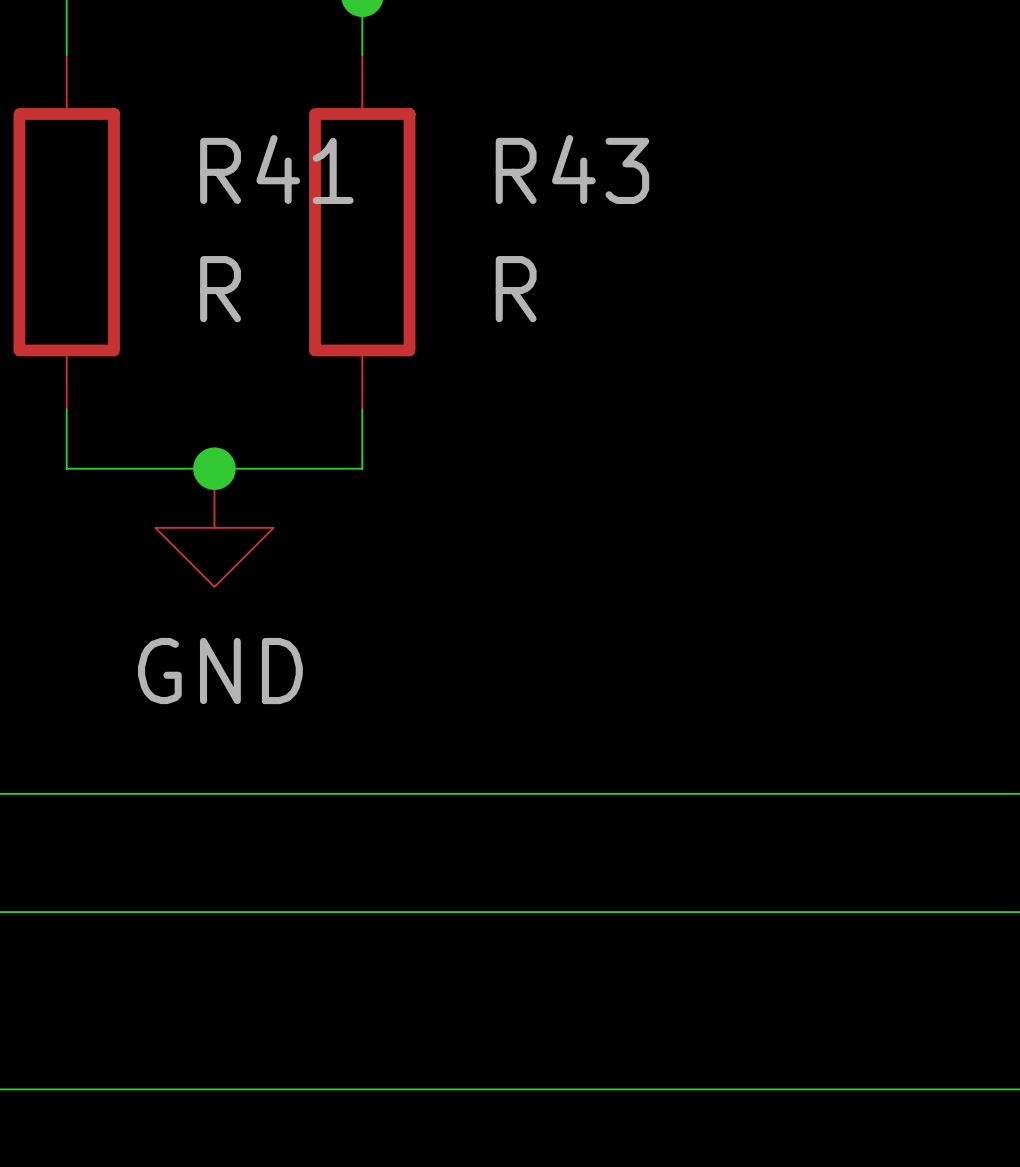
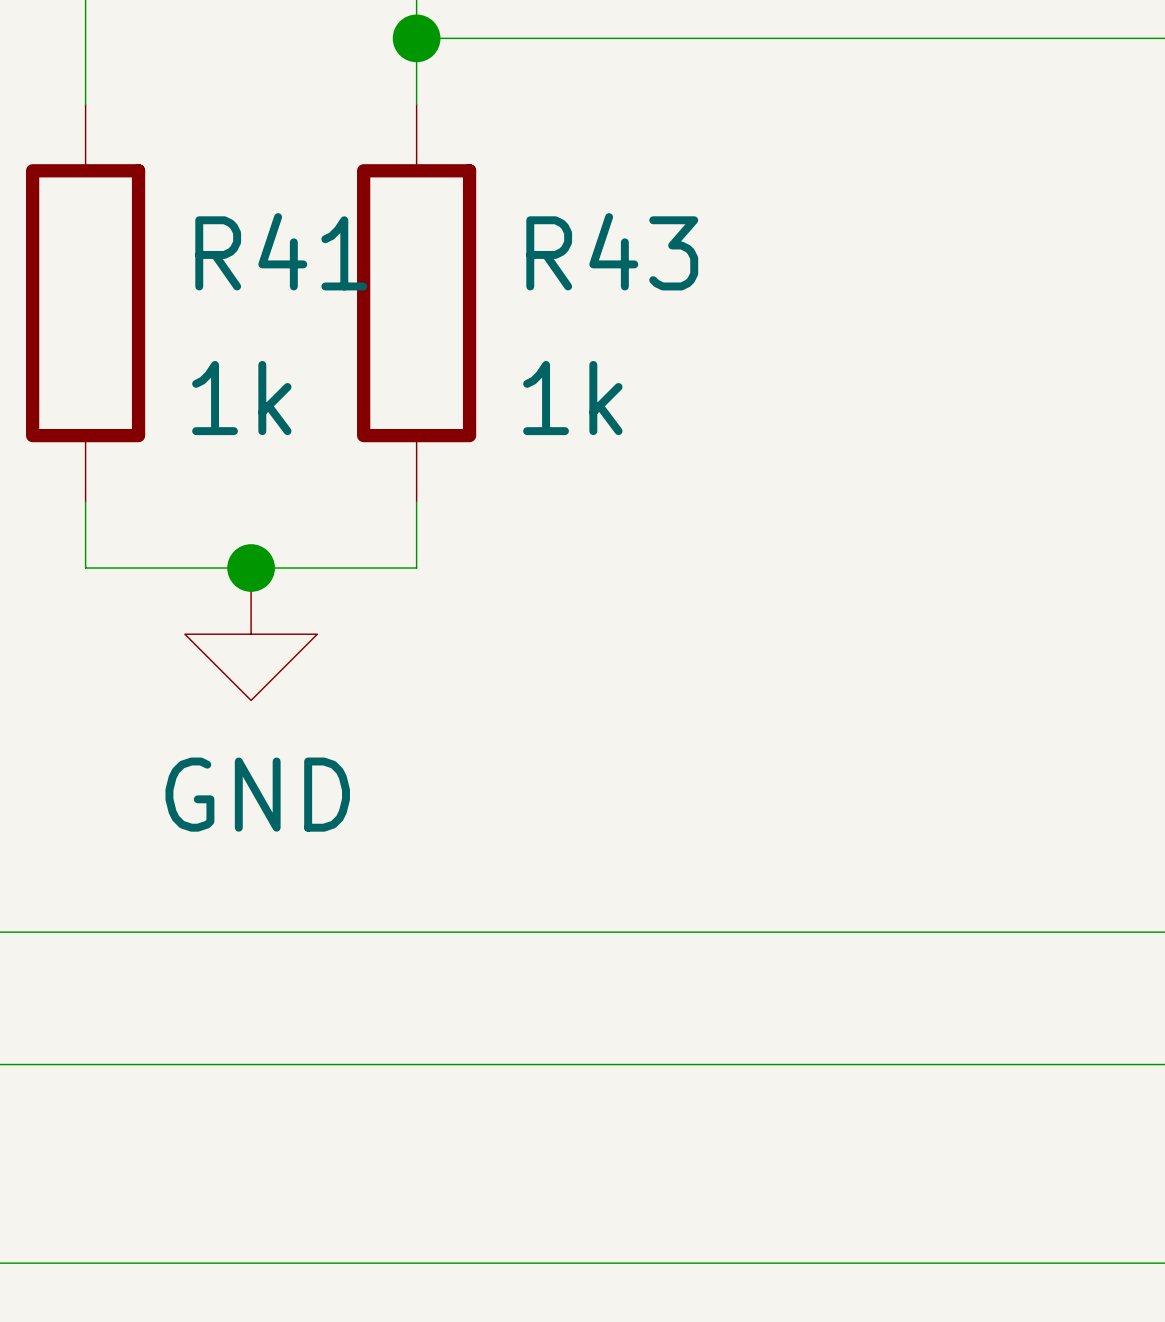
R41 name position: R41 (276, 169) -> R41 (281, 251)
R43 name position: R43 (572, 169) -> R43 (612, 251)
R41 value: R (220, 289) -> 1k (241, 398)
R43 value: R (516, 289) -> 1k (572, 398)

